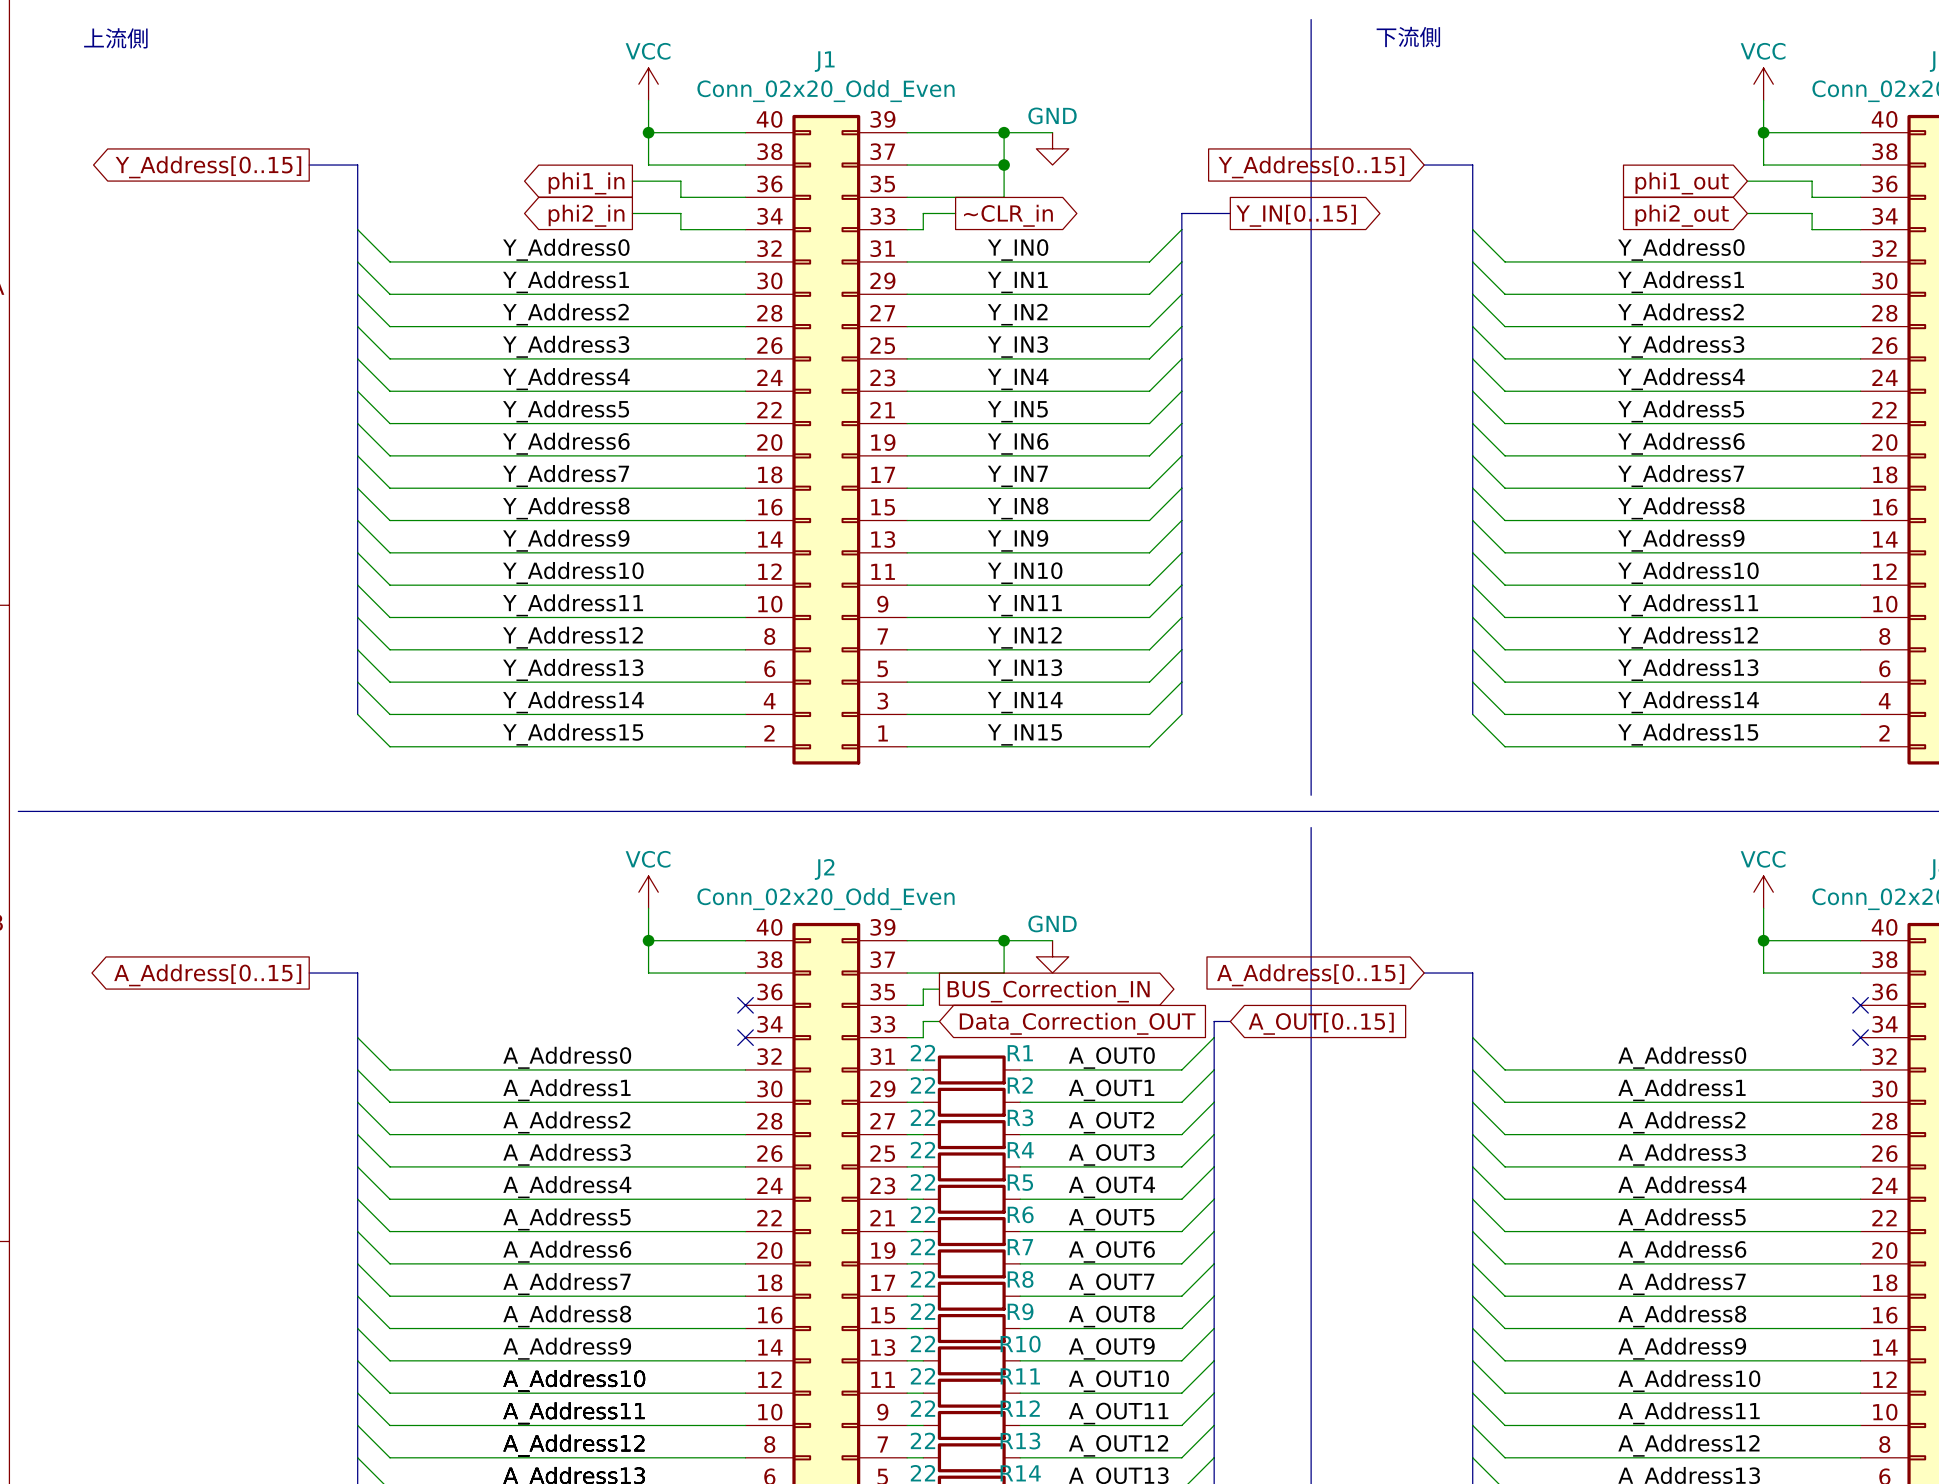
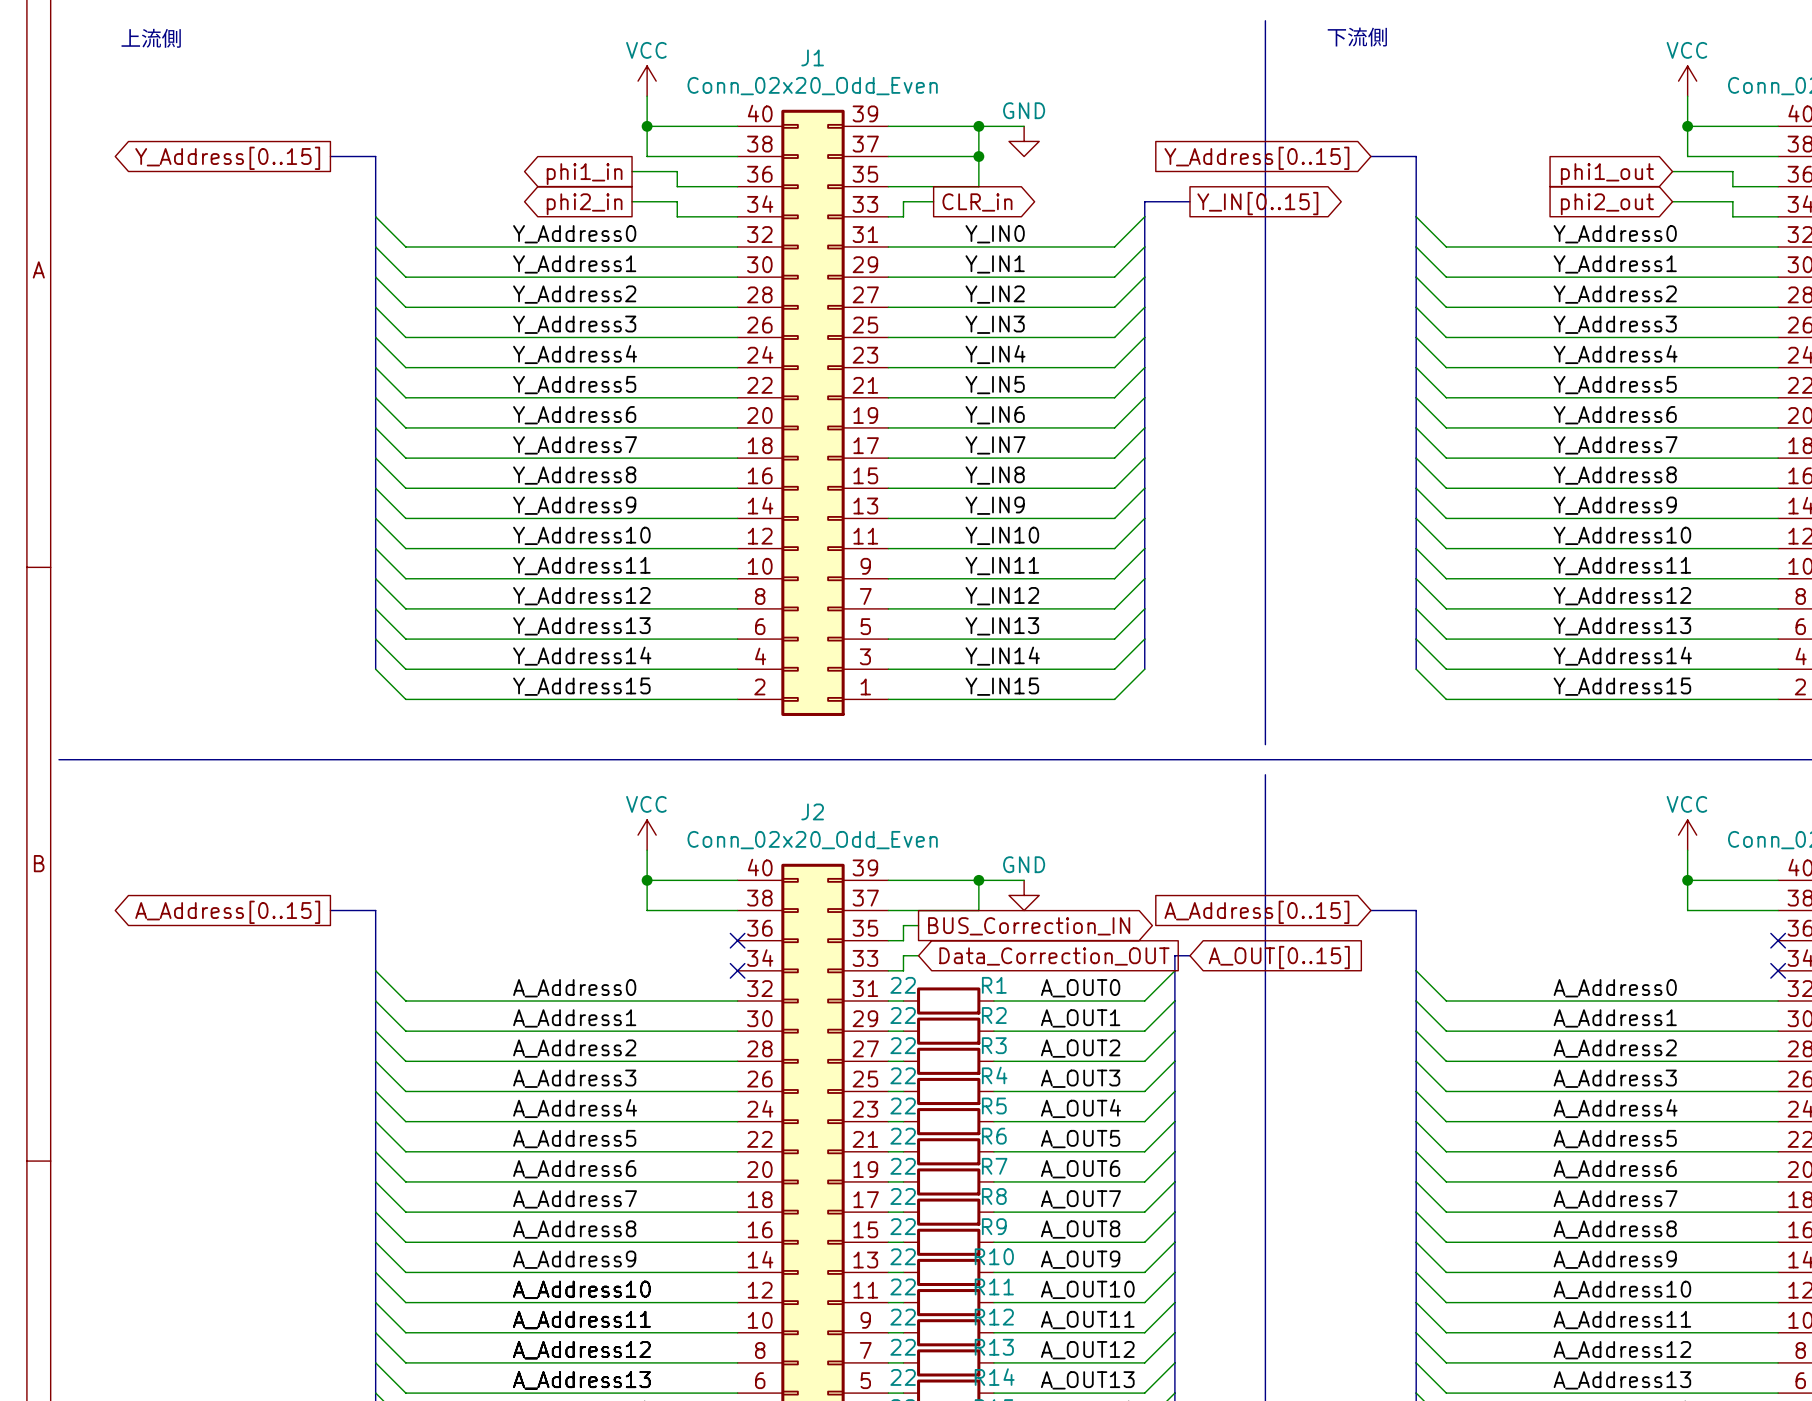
global label: ~CLR_in (1008, 215) -> CLR_in (977, 202)

